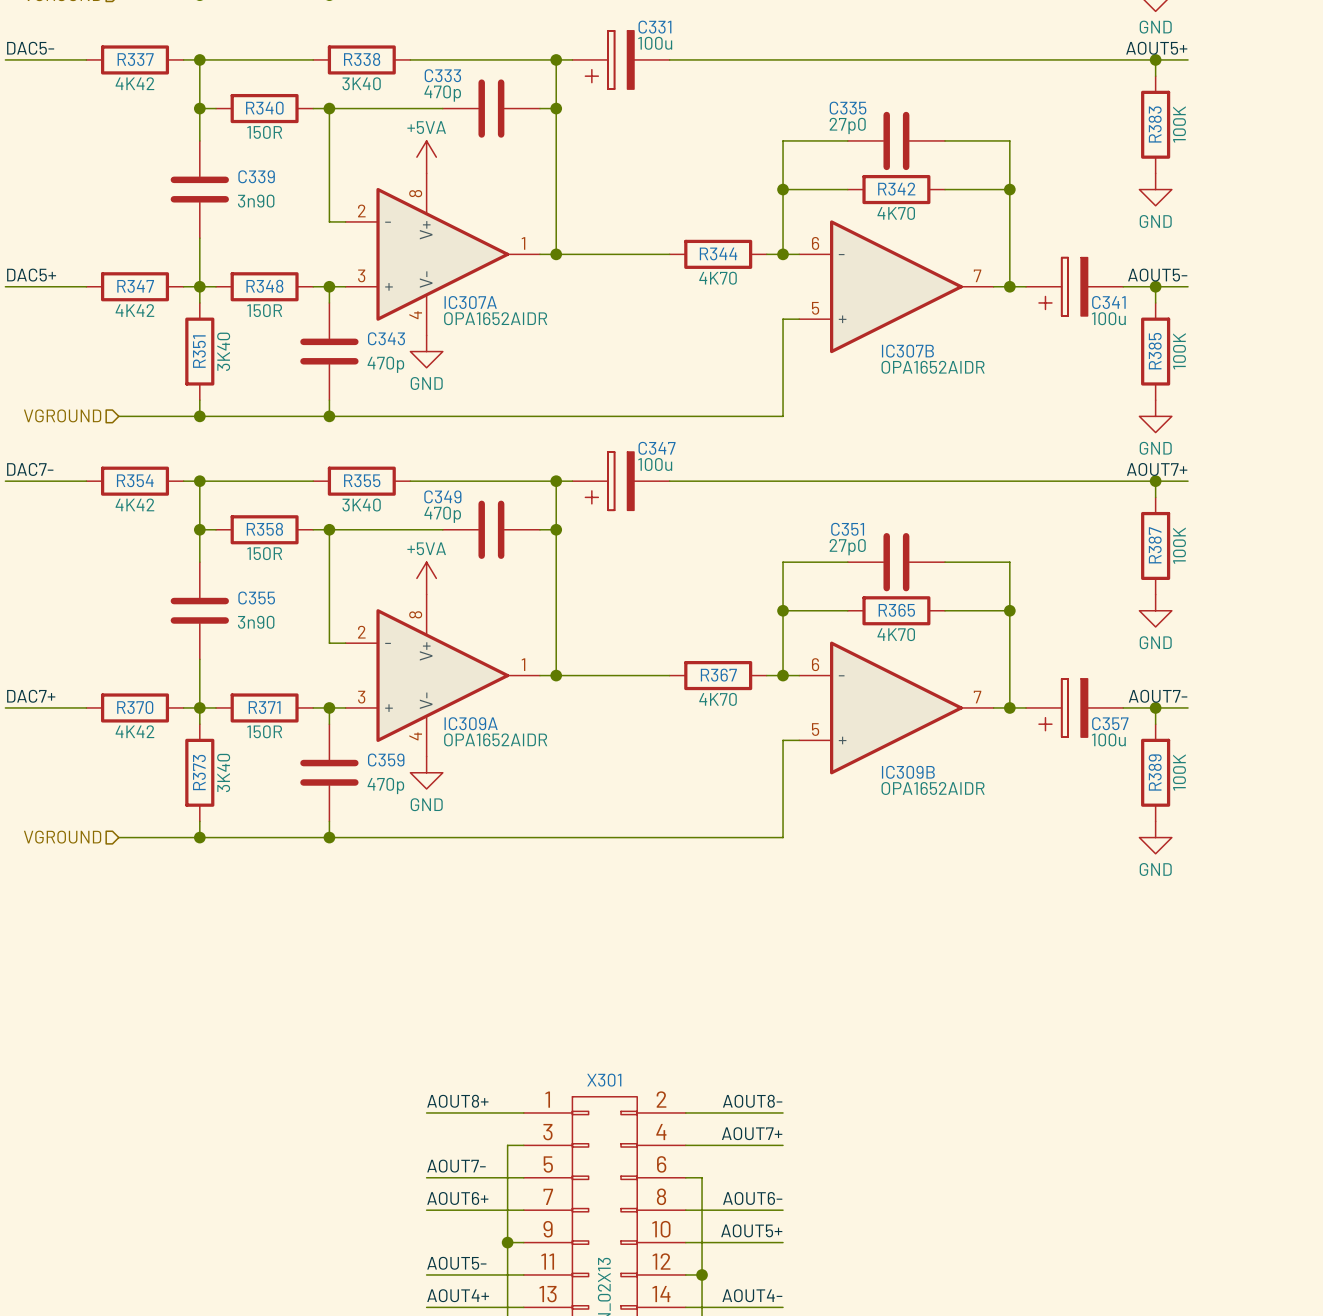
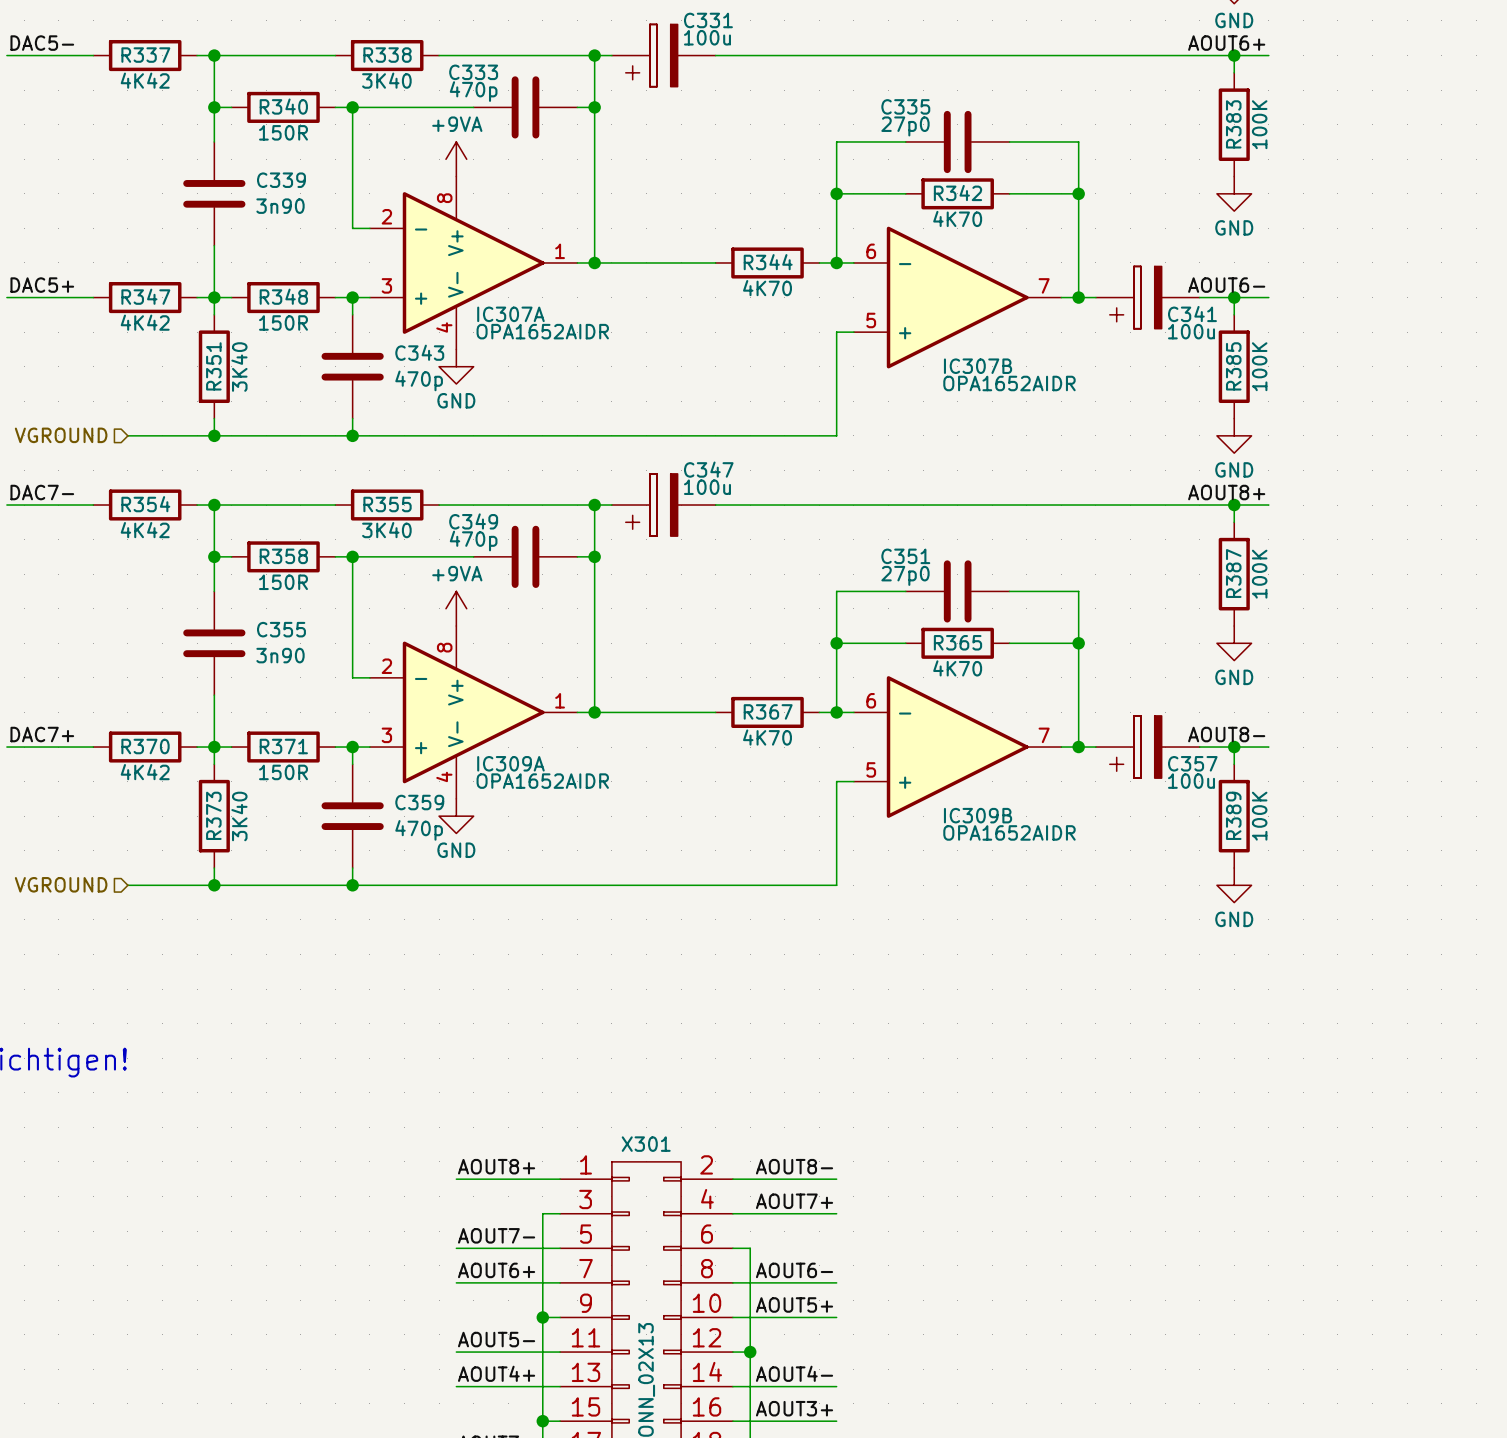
label: AOUT5+ (1156, 48) -> AOUT6+ (1226, 43)
power symbol: +5VA (426, 157) -> +9VA (456, 159)
label: AOUT5- (1157, 275) -> AOUT6- (1226, 285)
label: AOUT7+ (1157, 469) -> AOUT8+ (1226, 492)
power symbol: +5VA (426, 578) -> +9VA (456, 608)
label: AOUT7- (1158, 696) -> AOUT8- (1226, 734)

